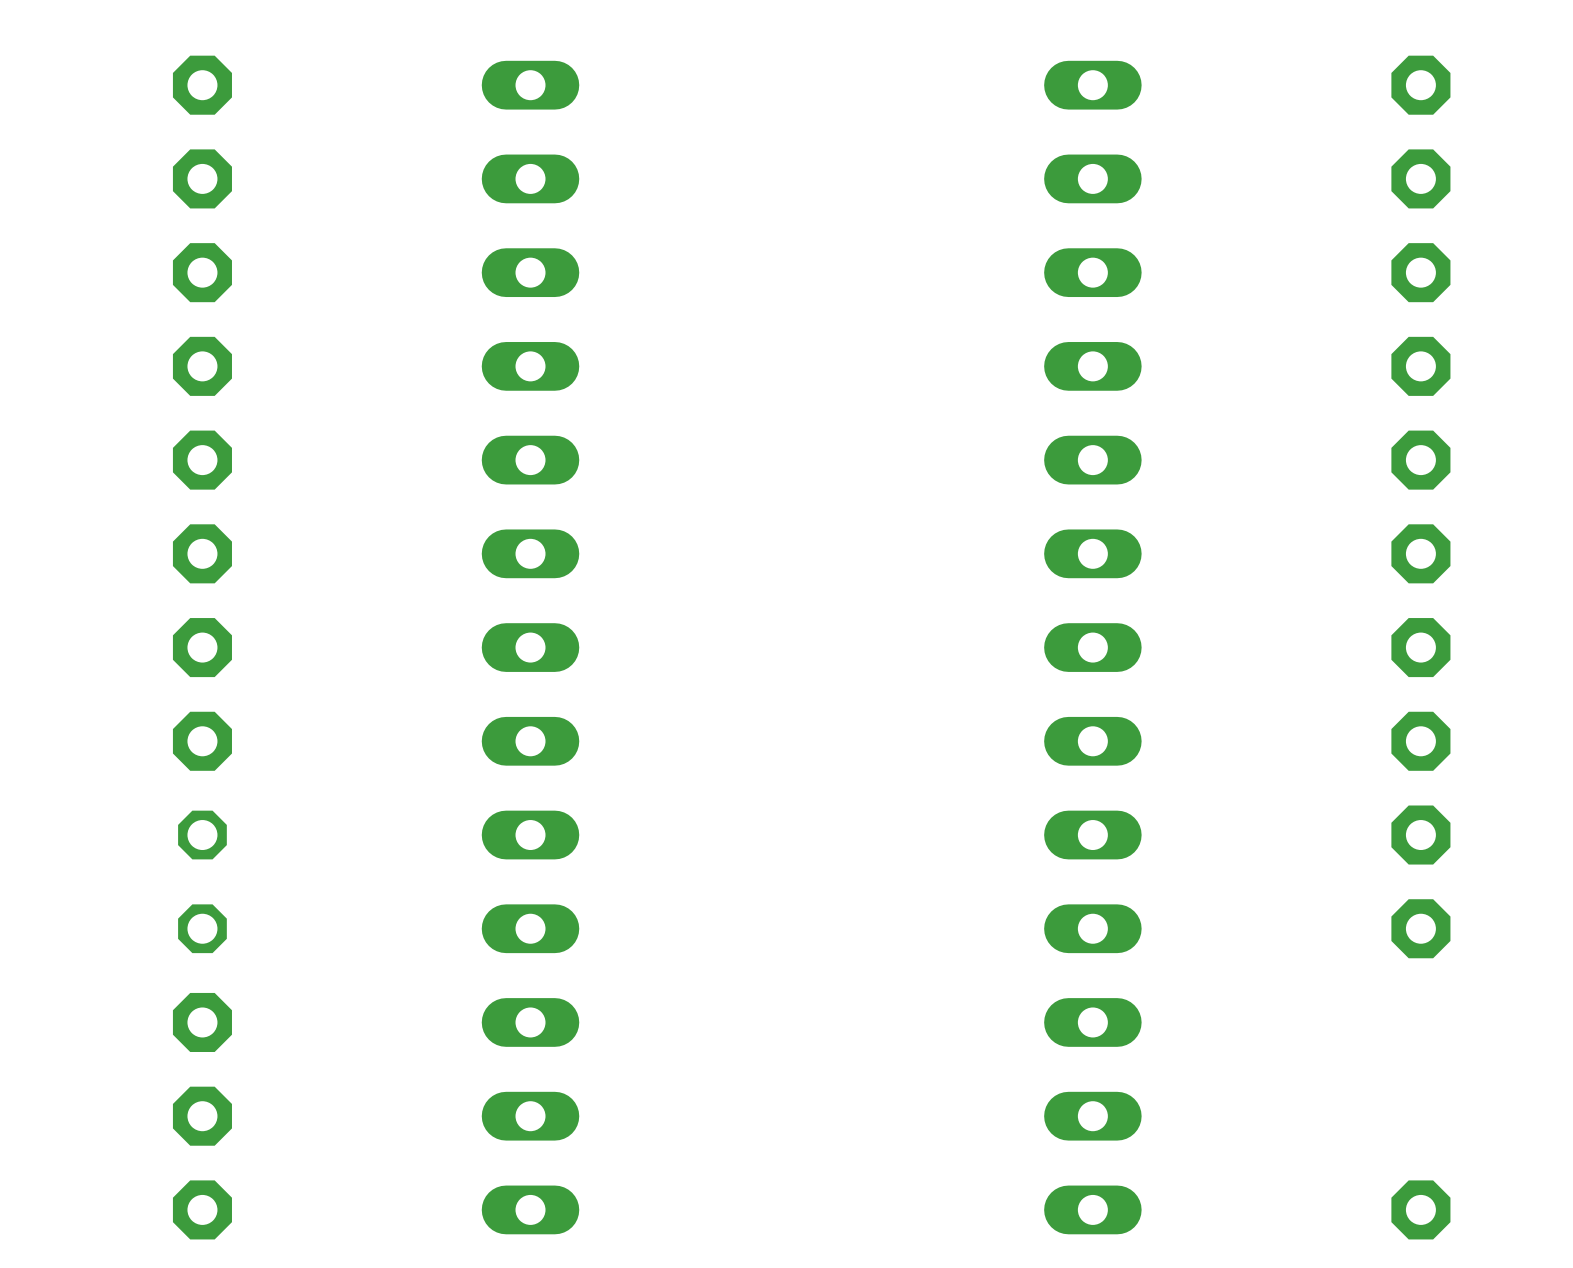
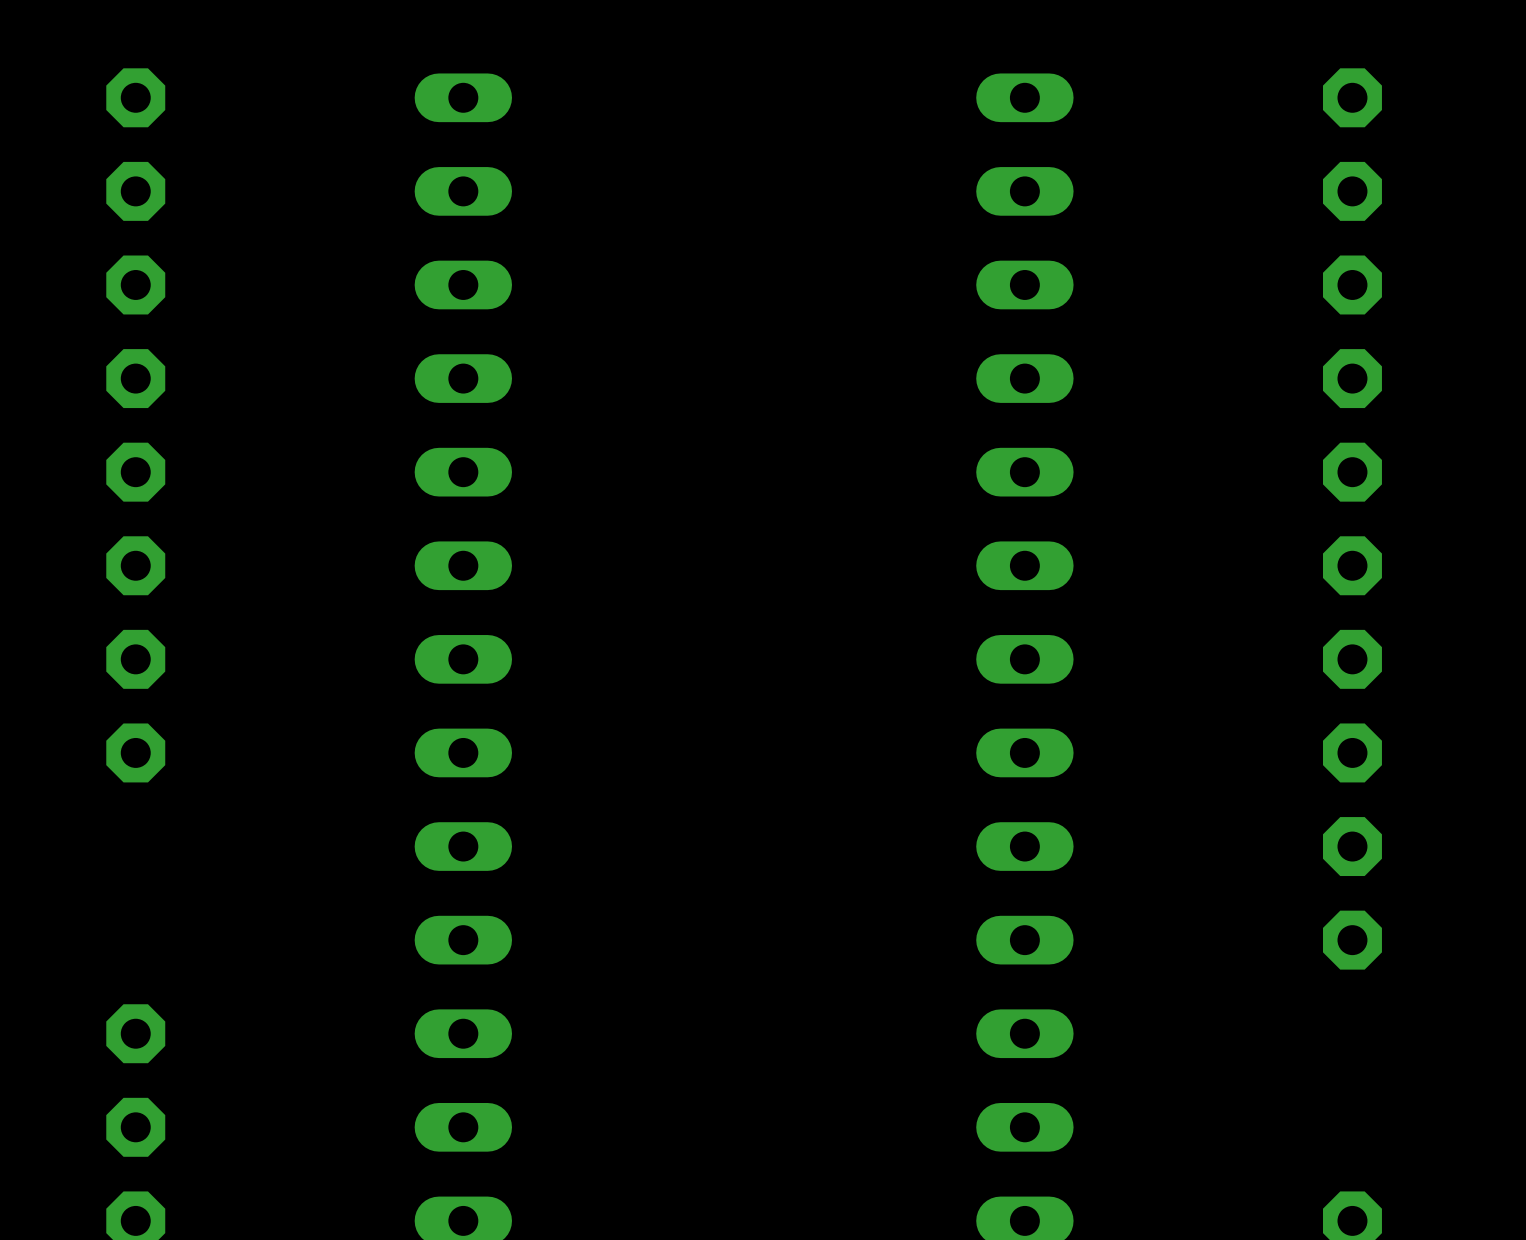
part: (202, 881) -> none

